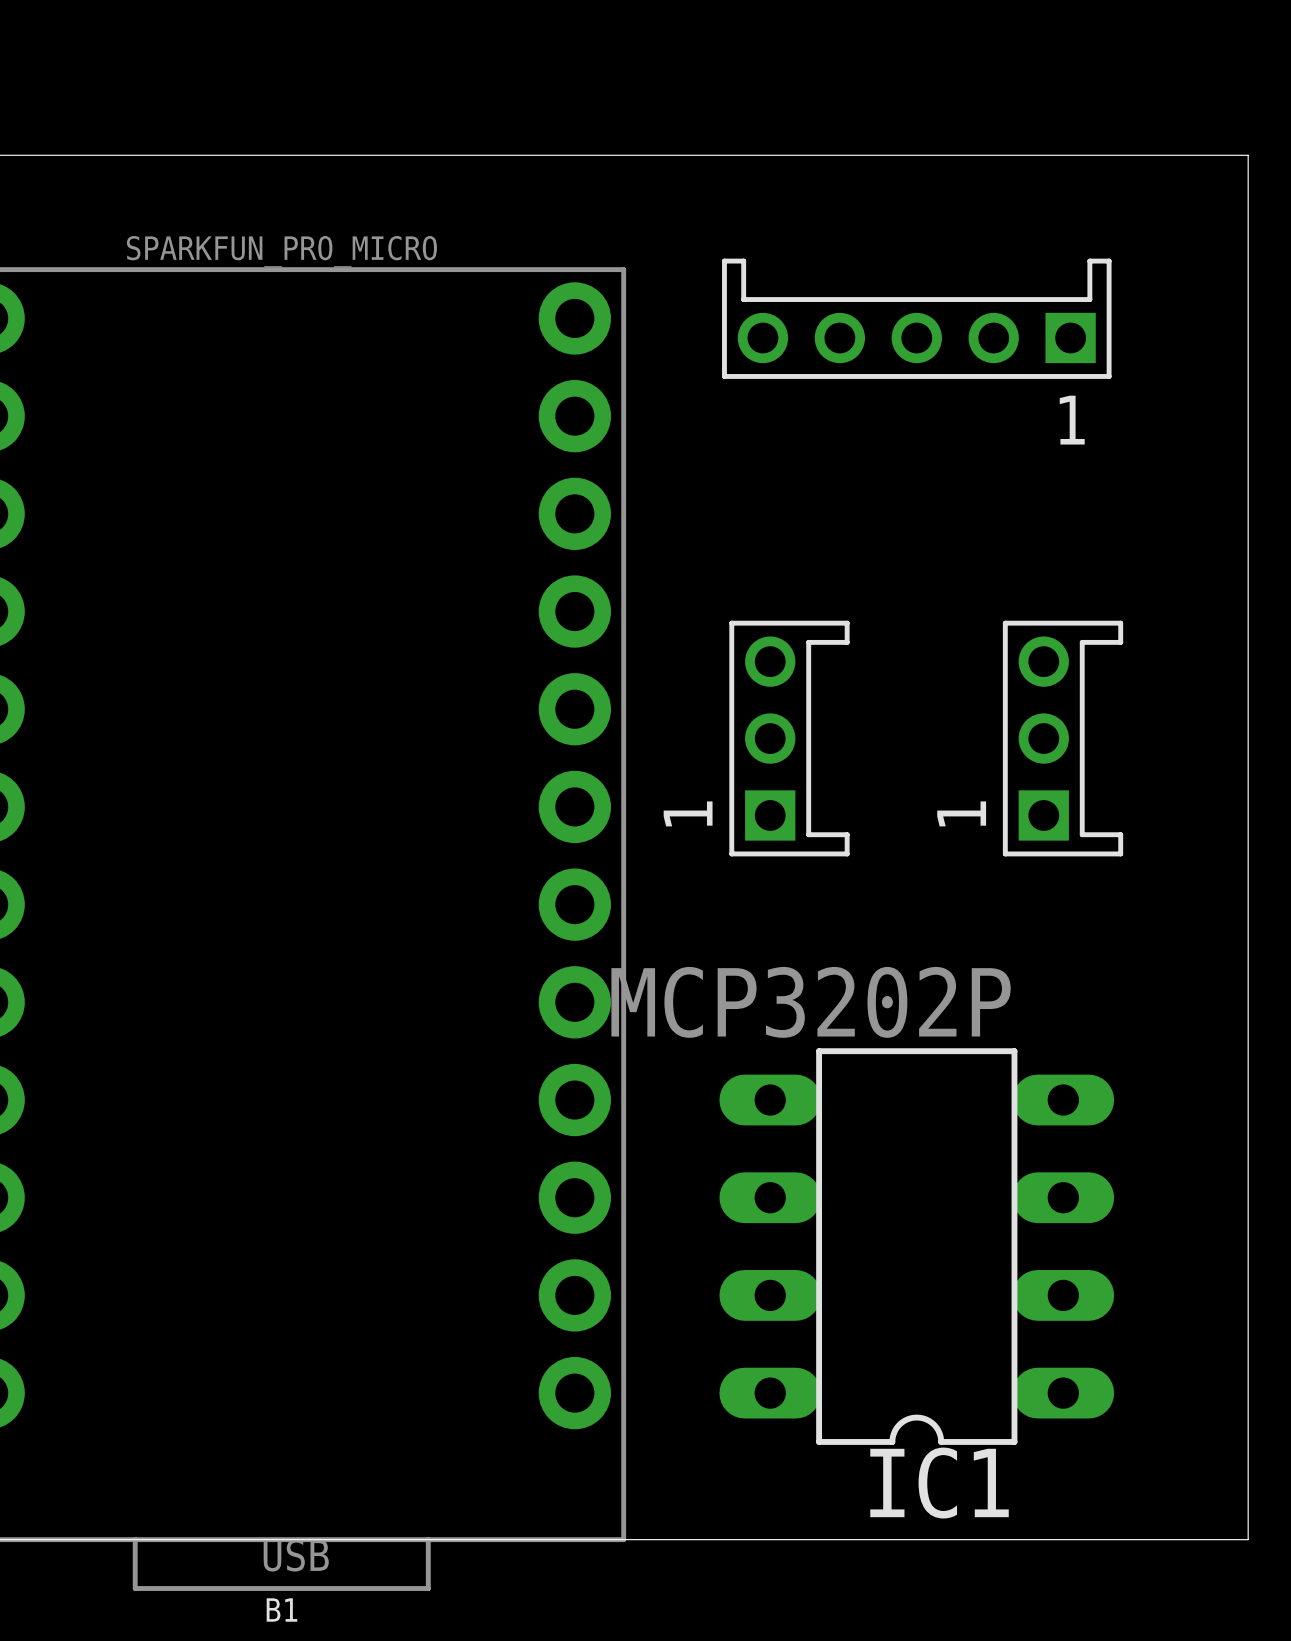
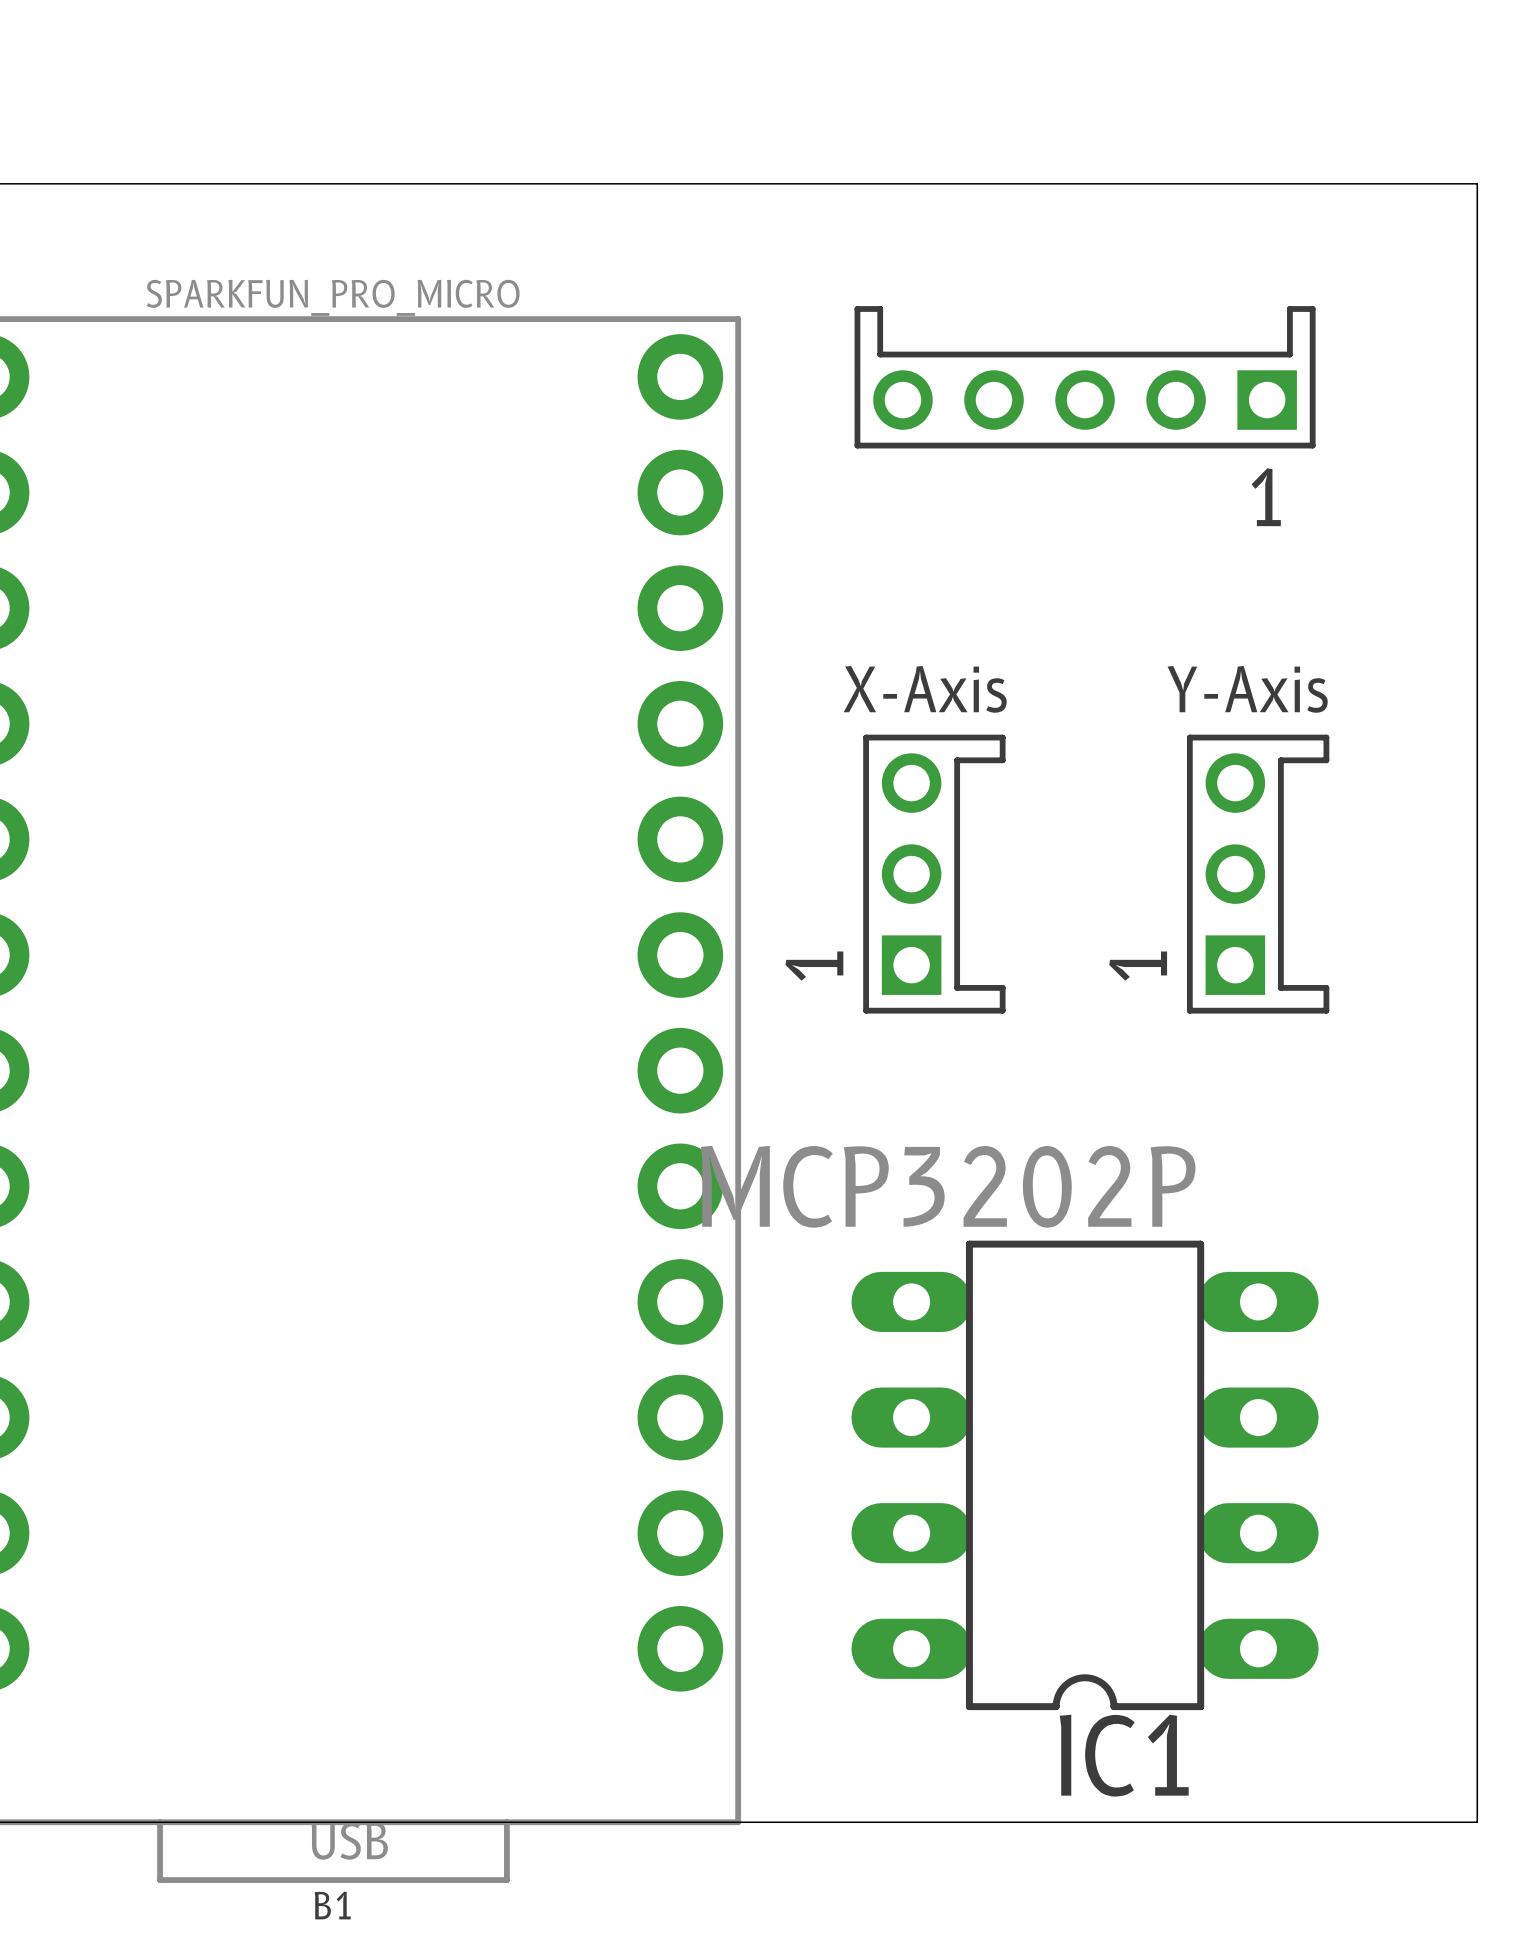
text: none -> X-Axis (925, 689)
text: none -> Y-Axis (1247, 689)

